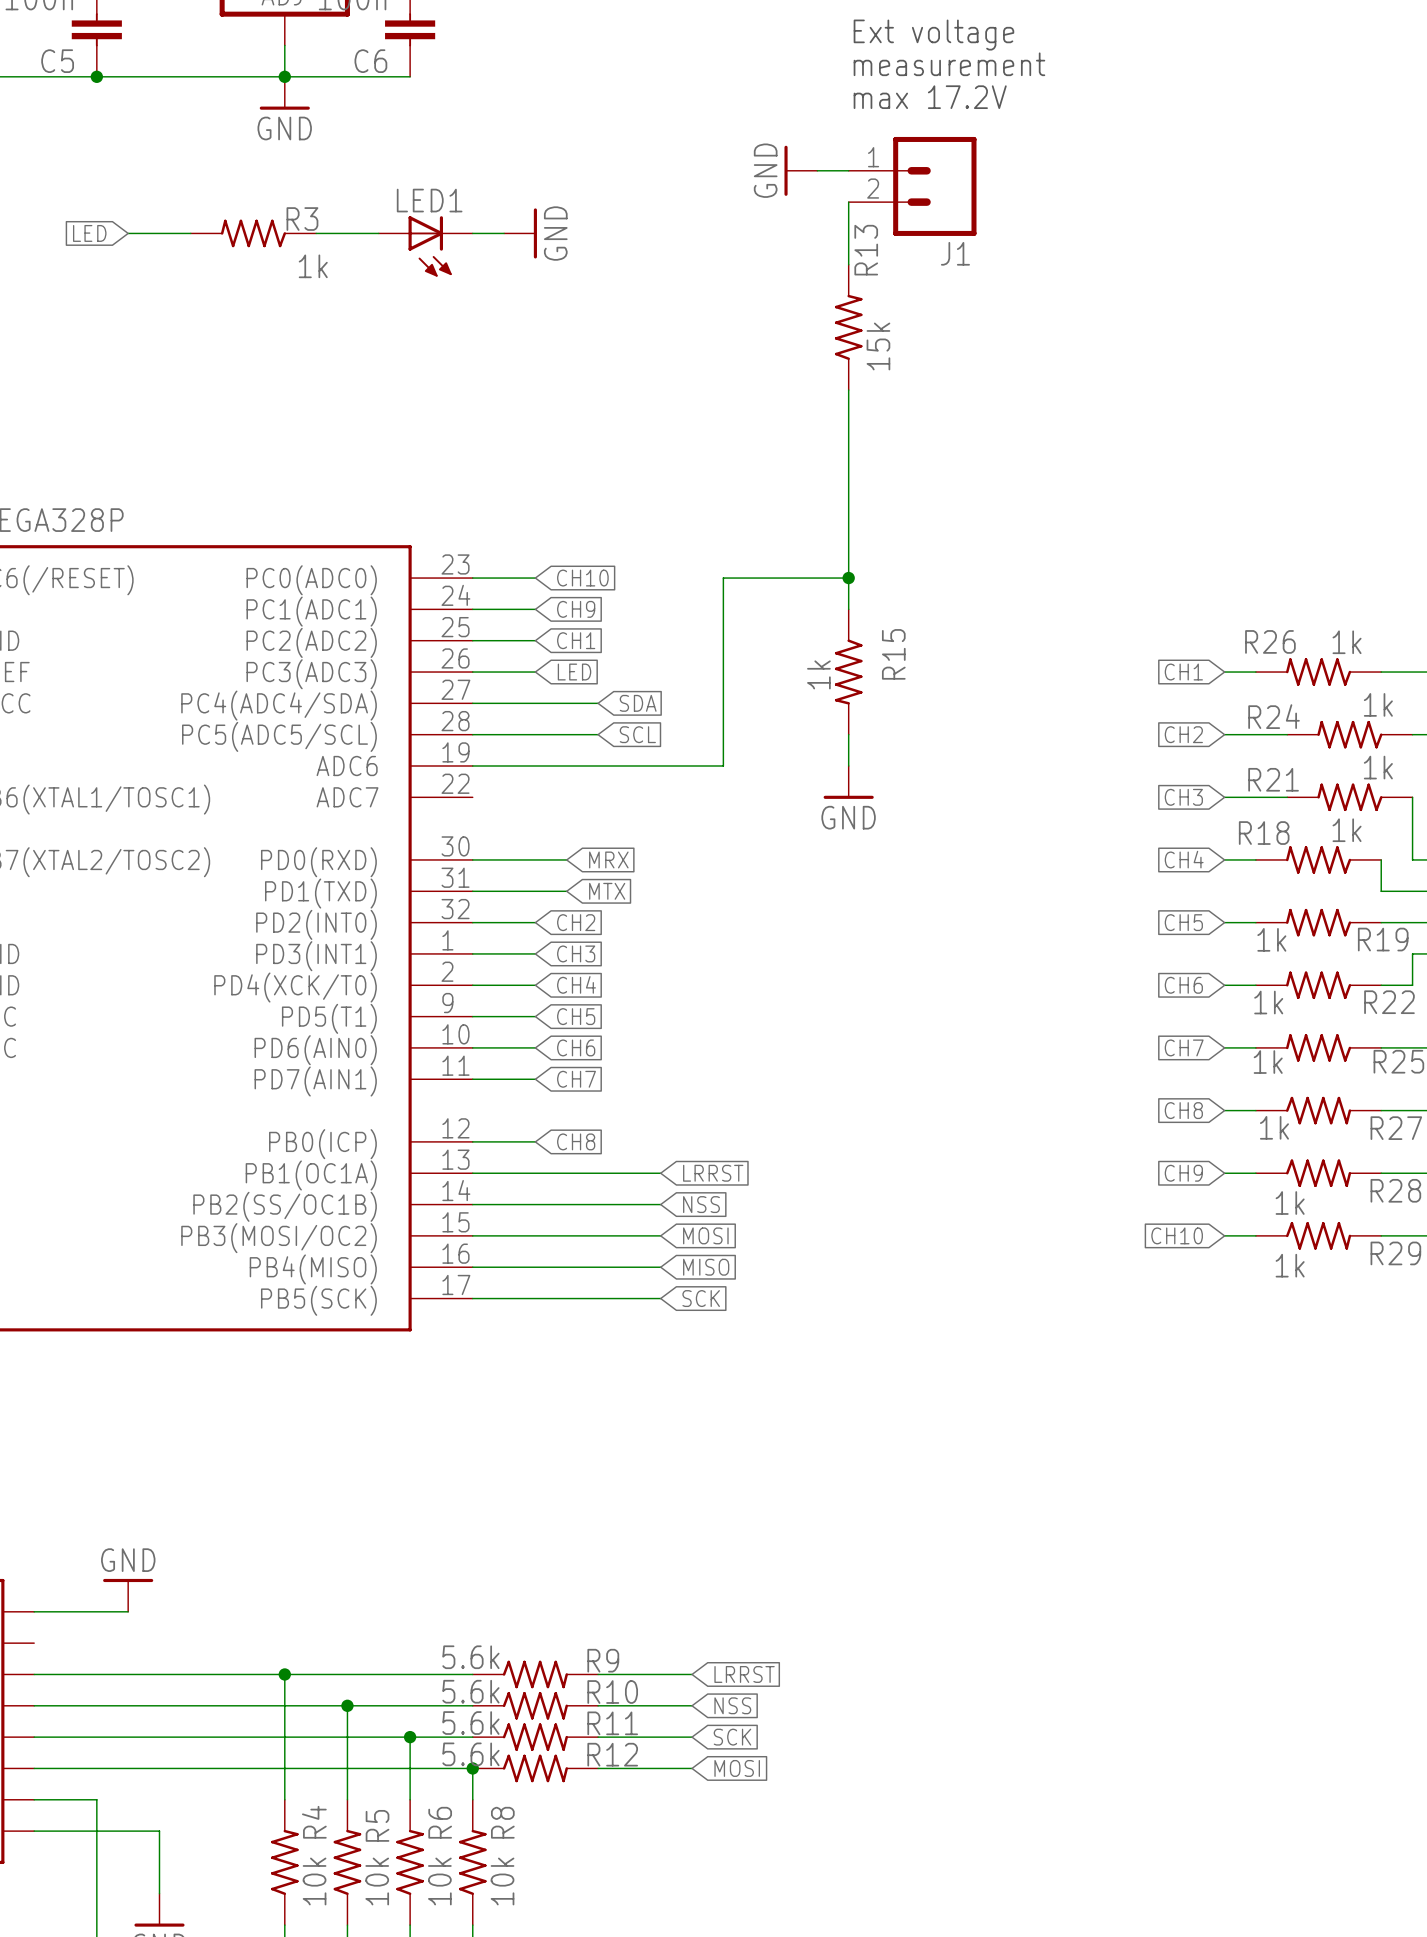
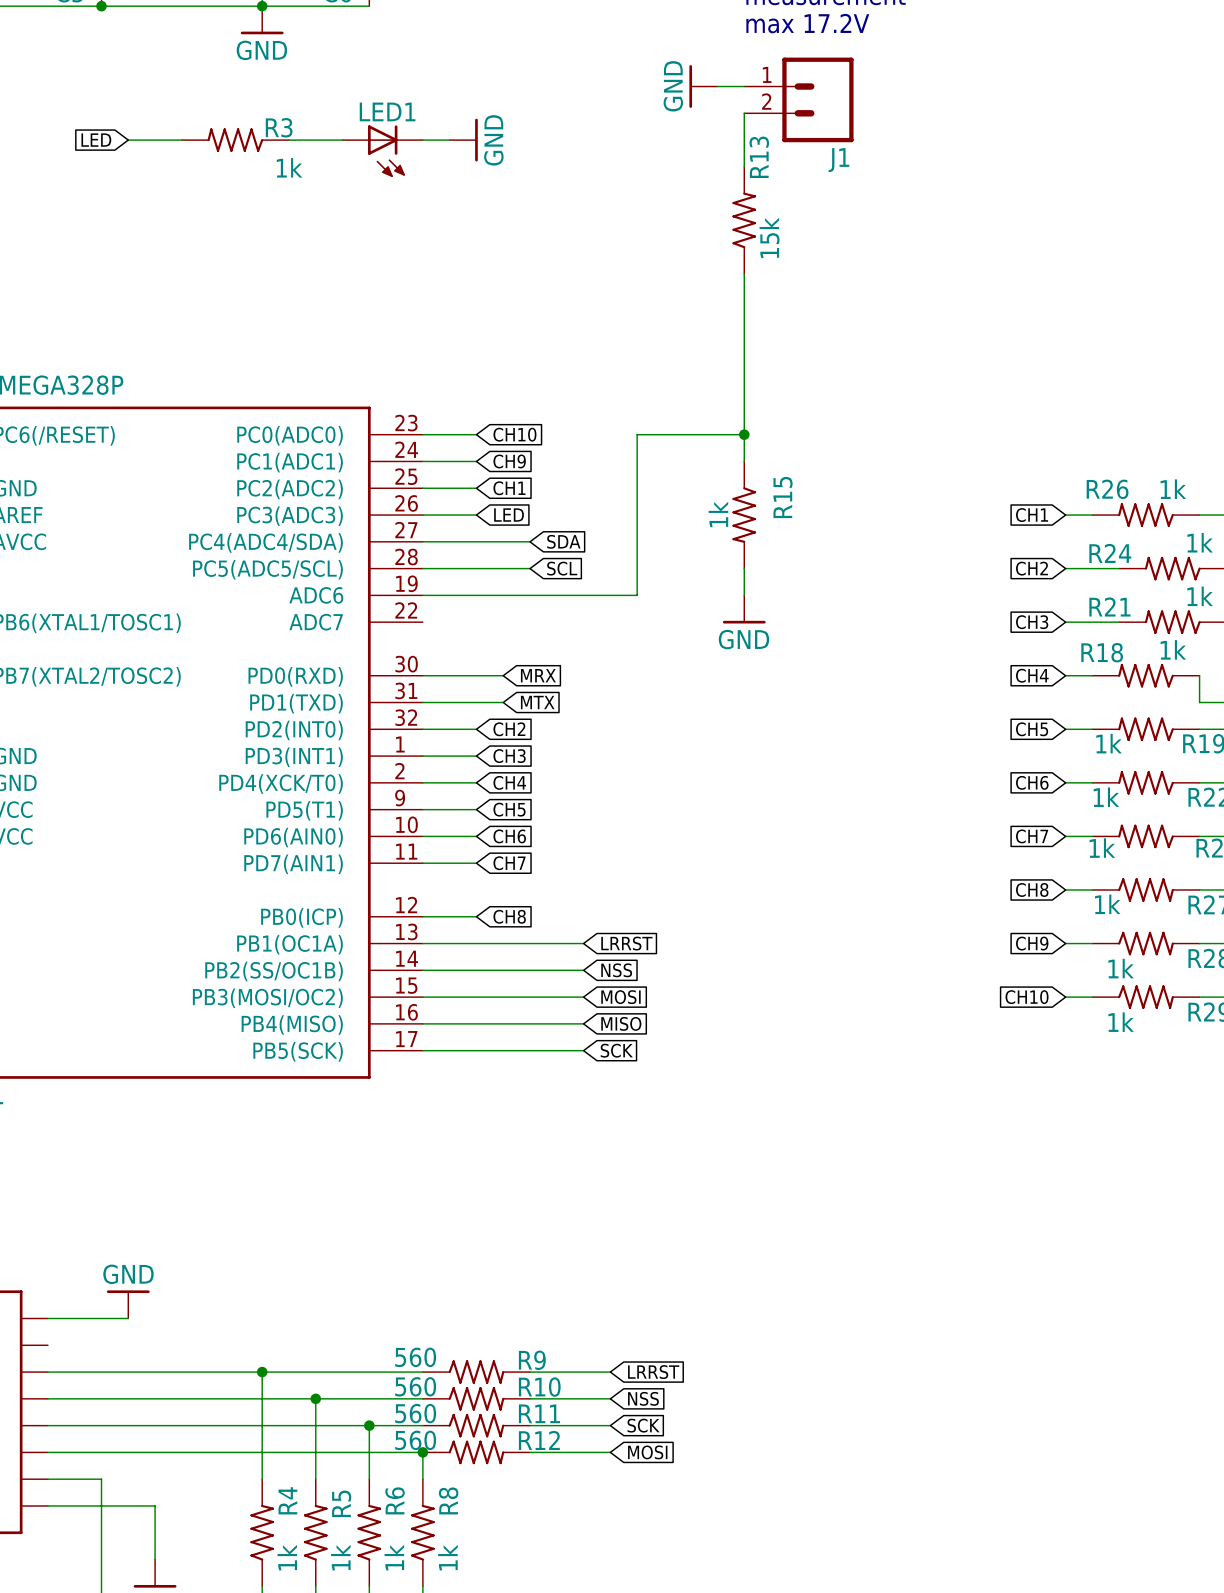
R9 value: 5.6k (470, 1657) -> 560 (415, 1357)
R10 value: 5.6k (470, 1691) -> 560 (415, 1386)
R11 value: 5.6k (470, 1723) -> 560 (415, 1413)
R12 value: 5.6k (470, 1754) -> 560 (415, 1440)
R4 value: 10k (314, 1881) -> 1k (287, 1557)
R5 value: 10k (377, 1881) -> 1k (340, 1557)
R6 value: 10k (439, 1881) -> 1k (394, 1557)
R8 value: 10k (502, 1881) -> 1k (447, 1557)

